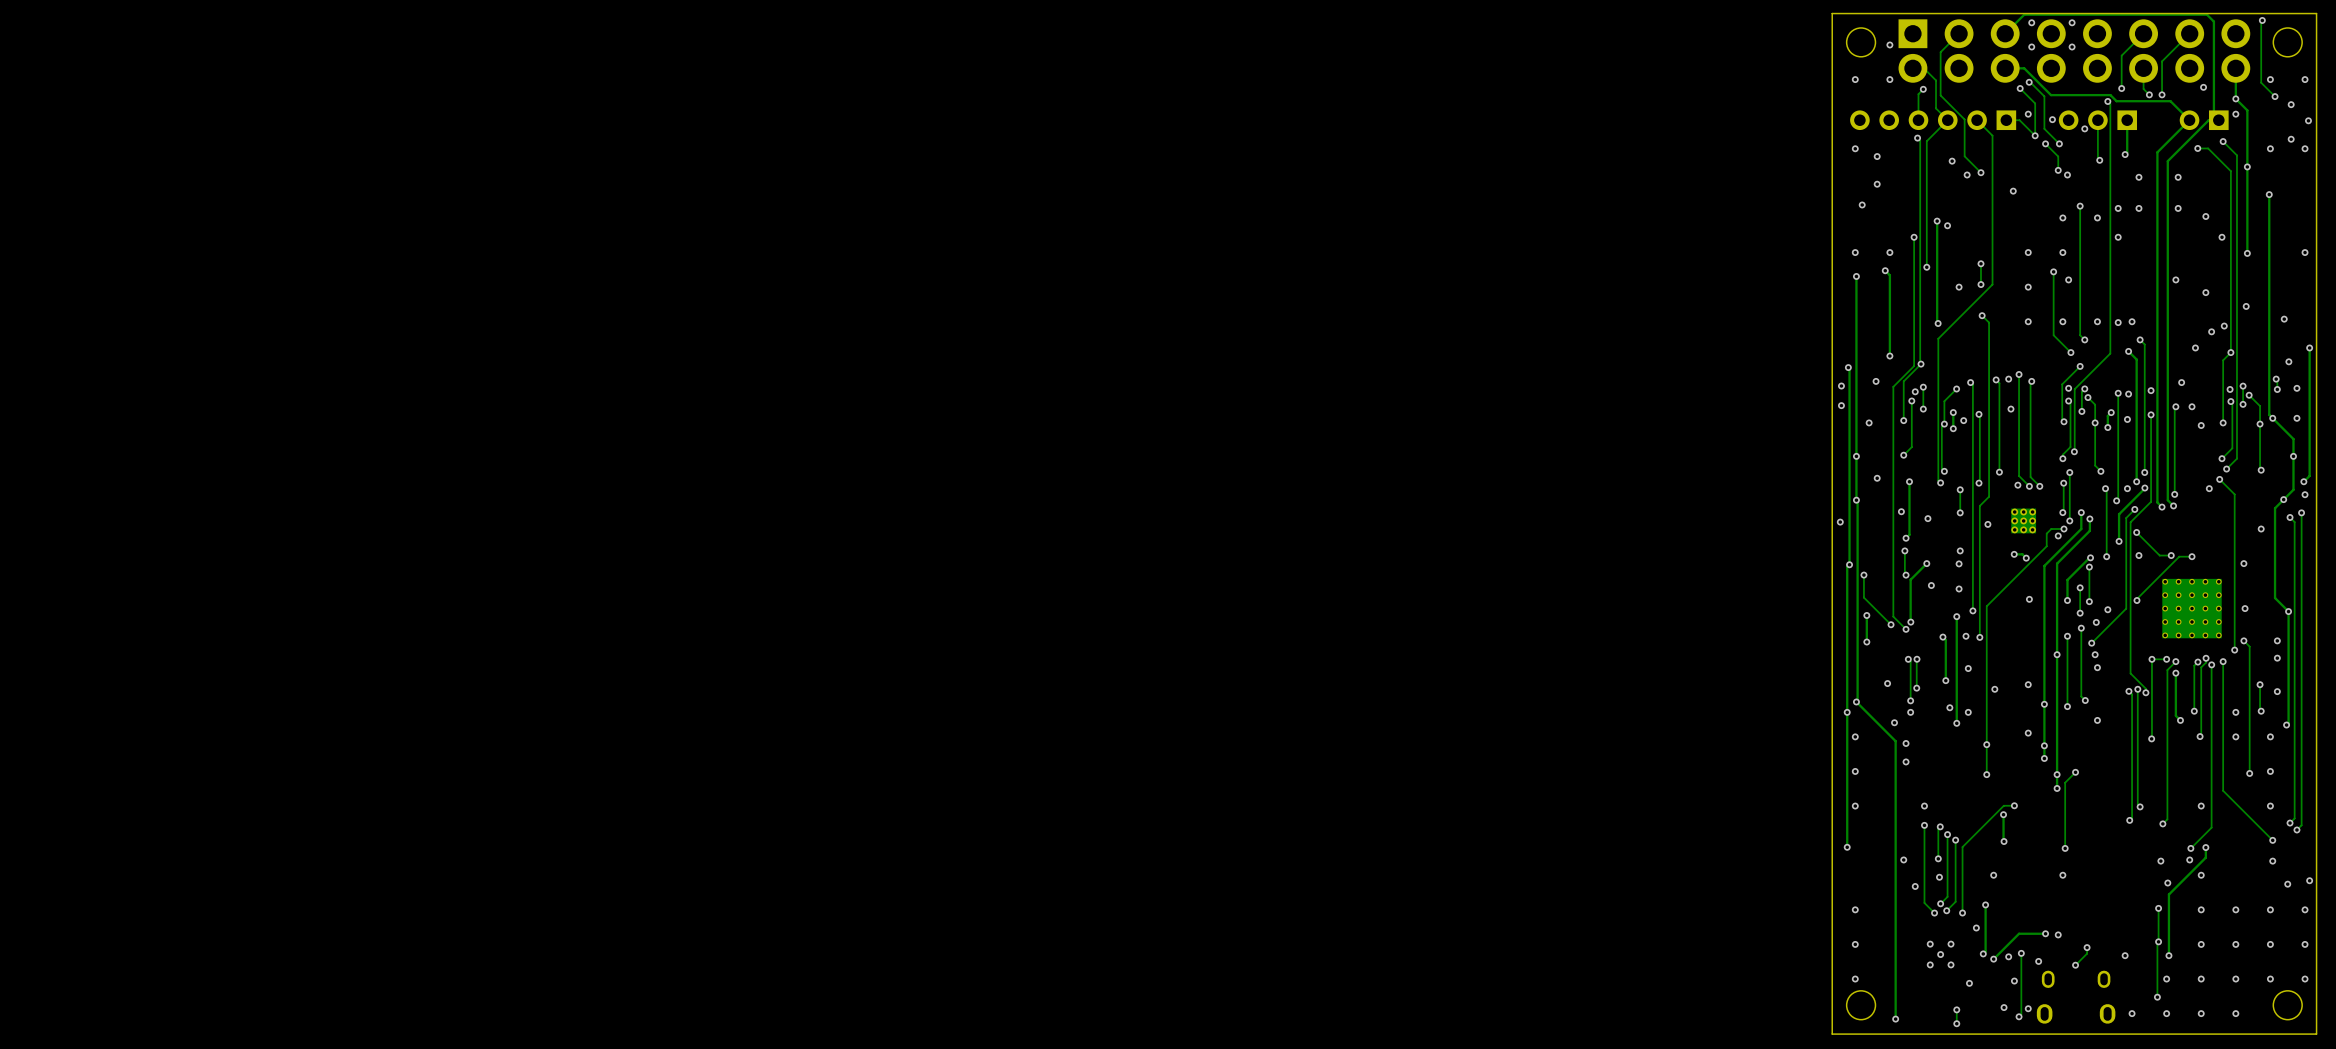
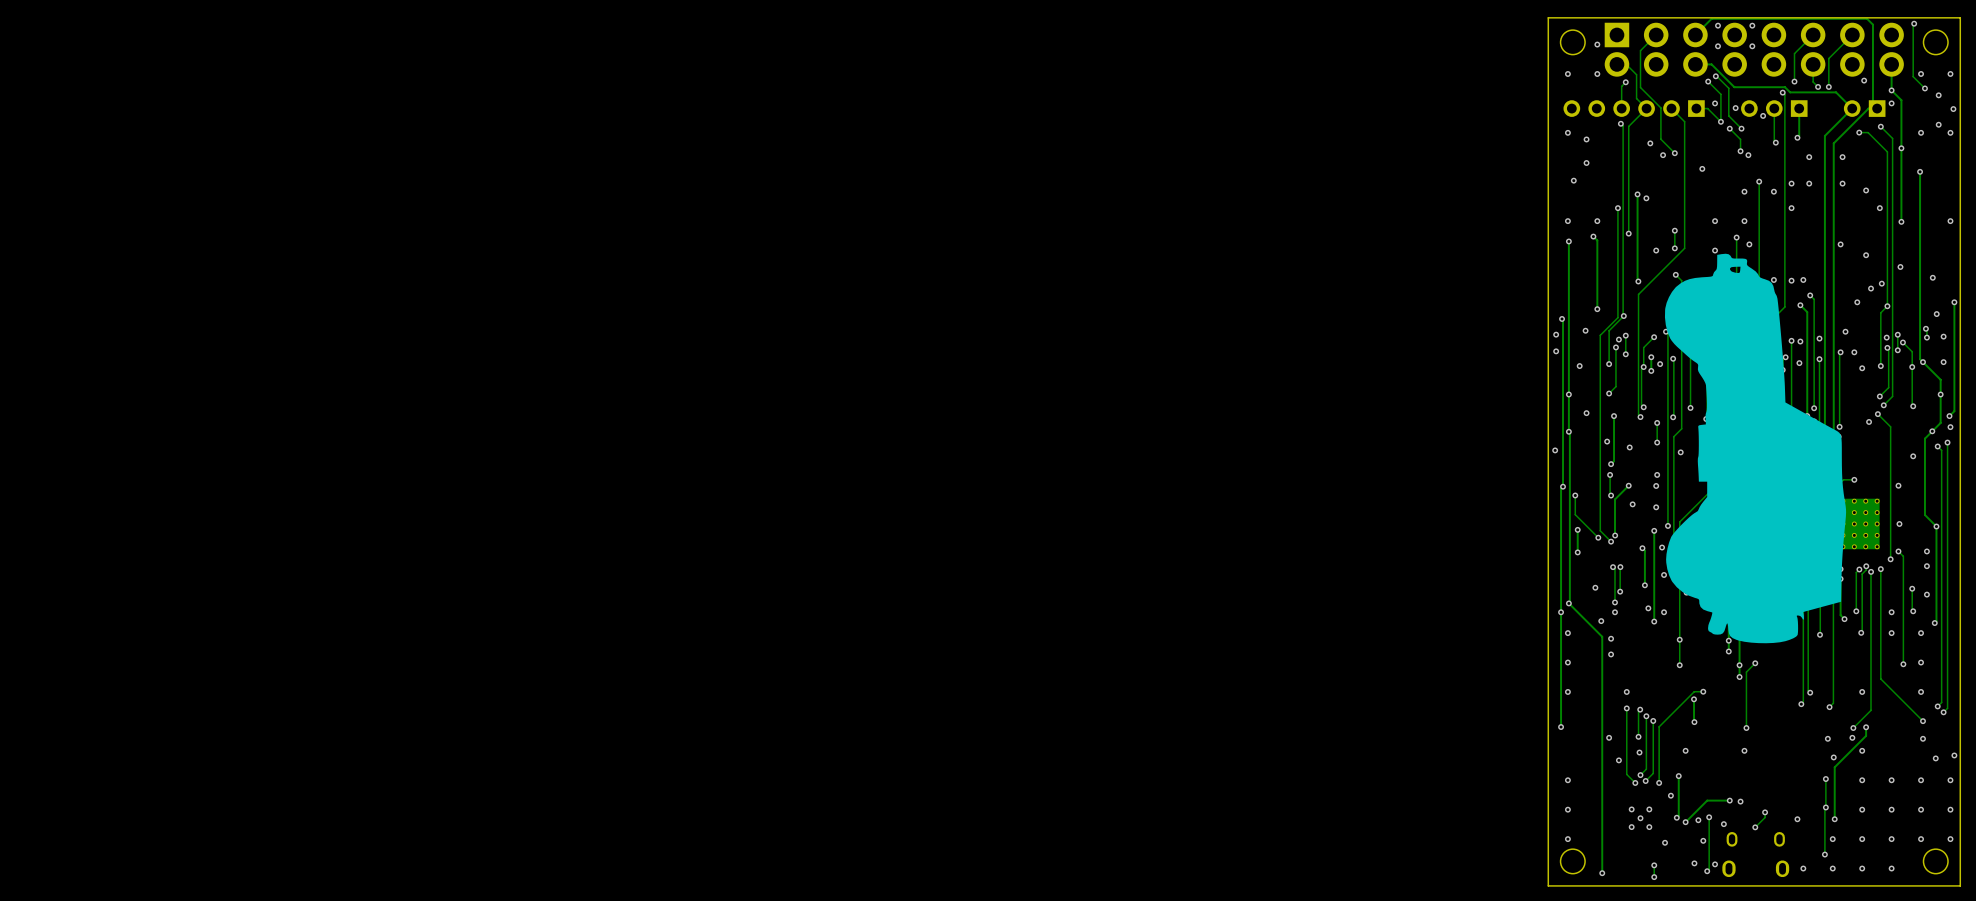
part: none -> (1755, 448)

